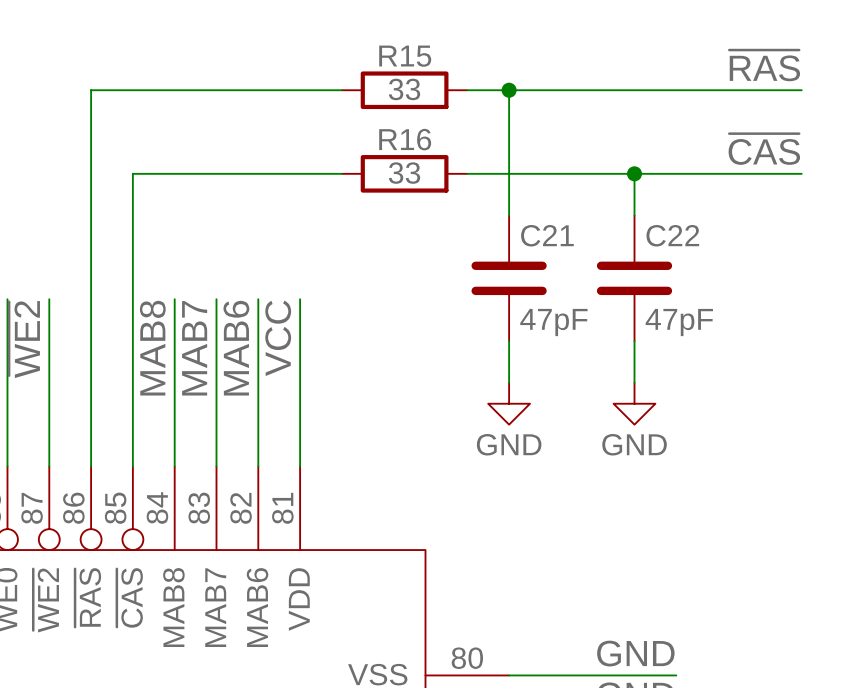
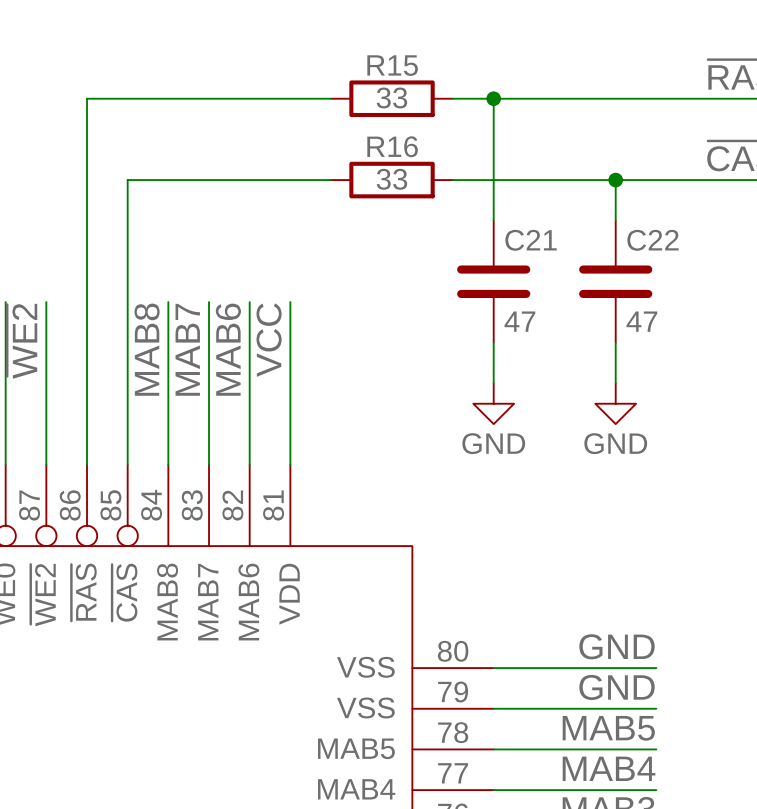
C21 value: 47pF (553, 322) -> 47 (519, 321)
C22 value: 47pF (679, 322) -> 47 (641, 321)

